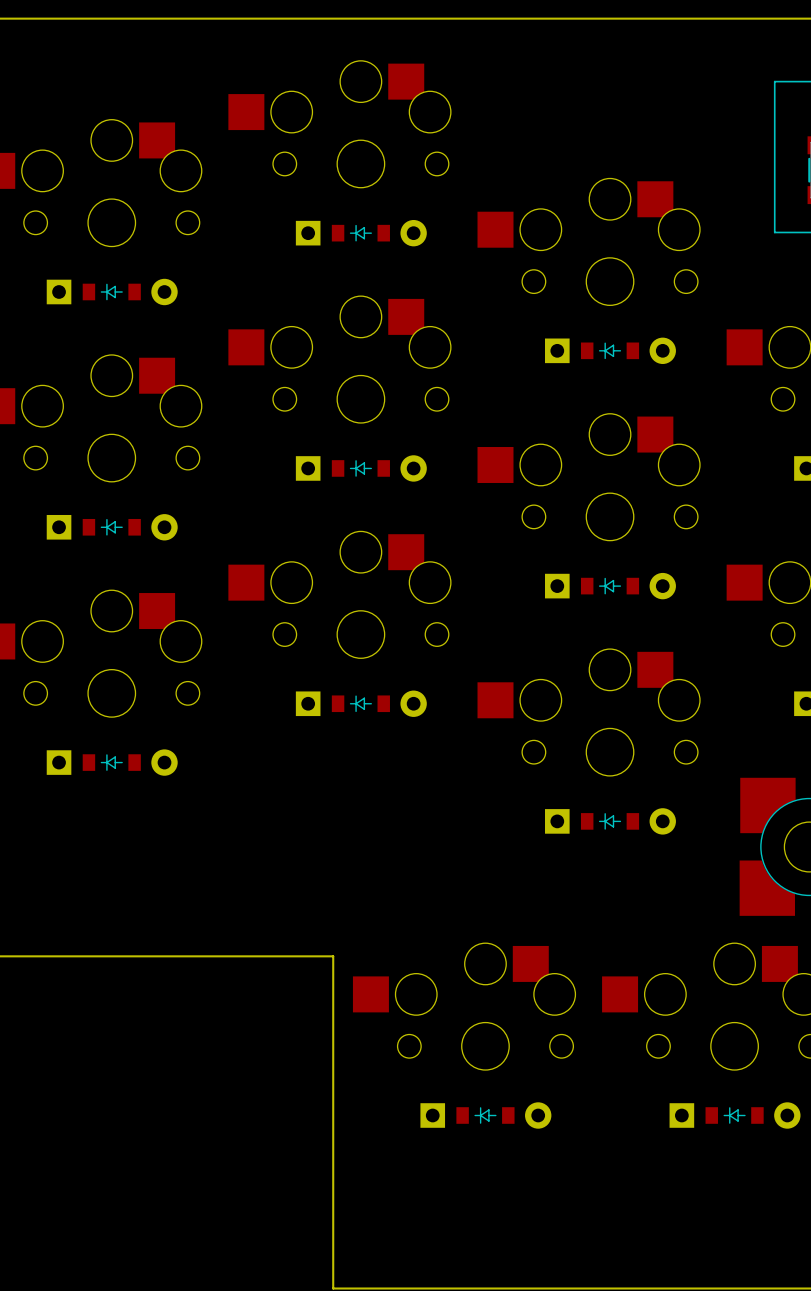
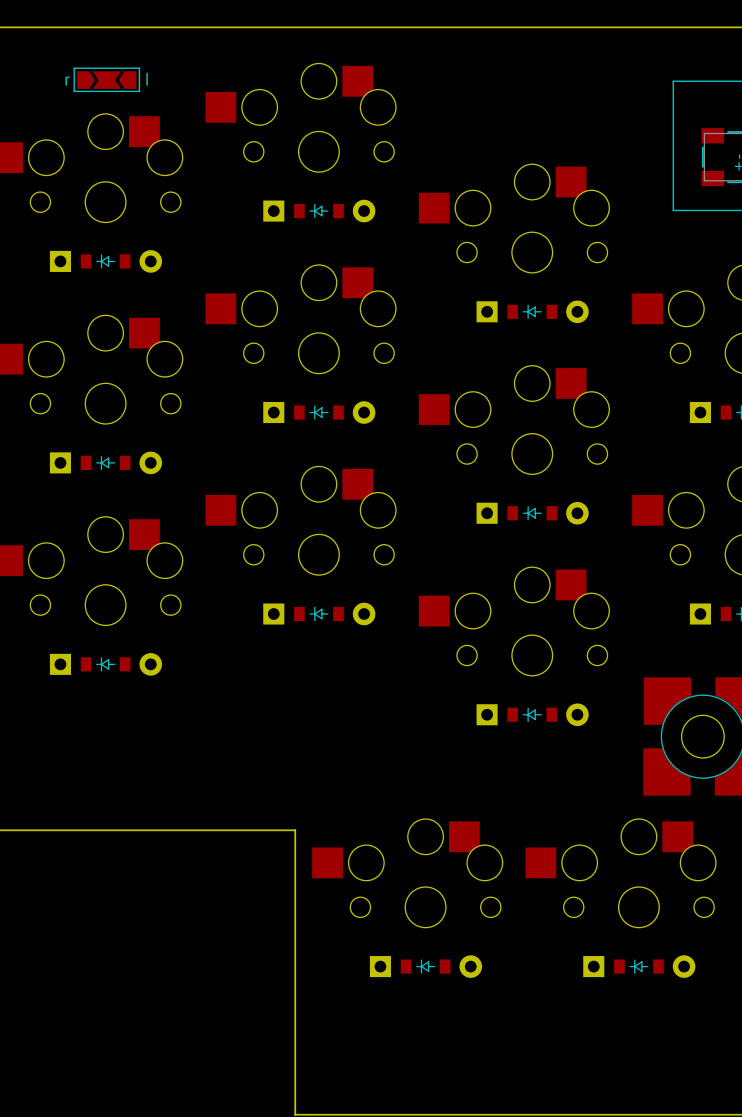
part: none -> (106, 79)

